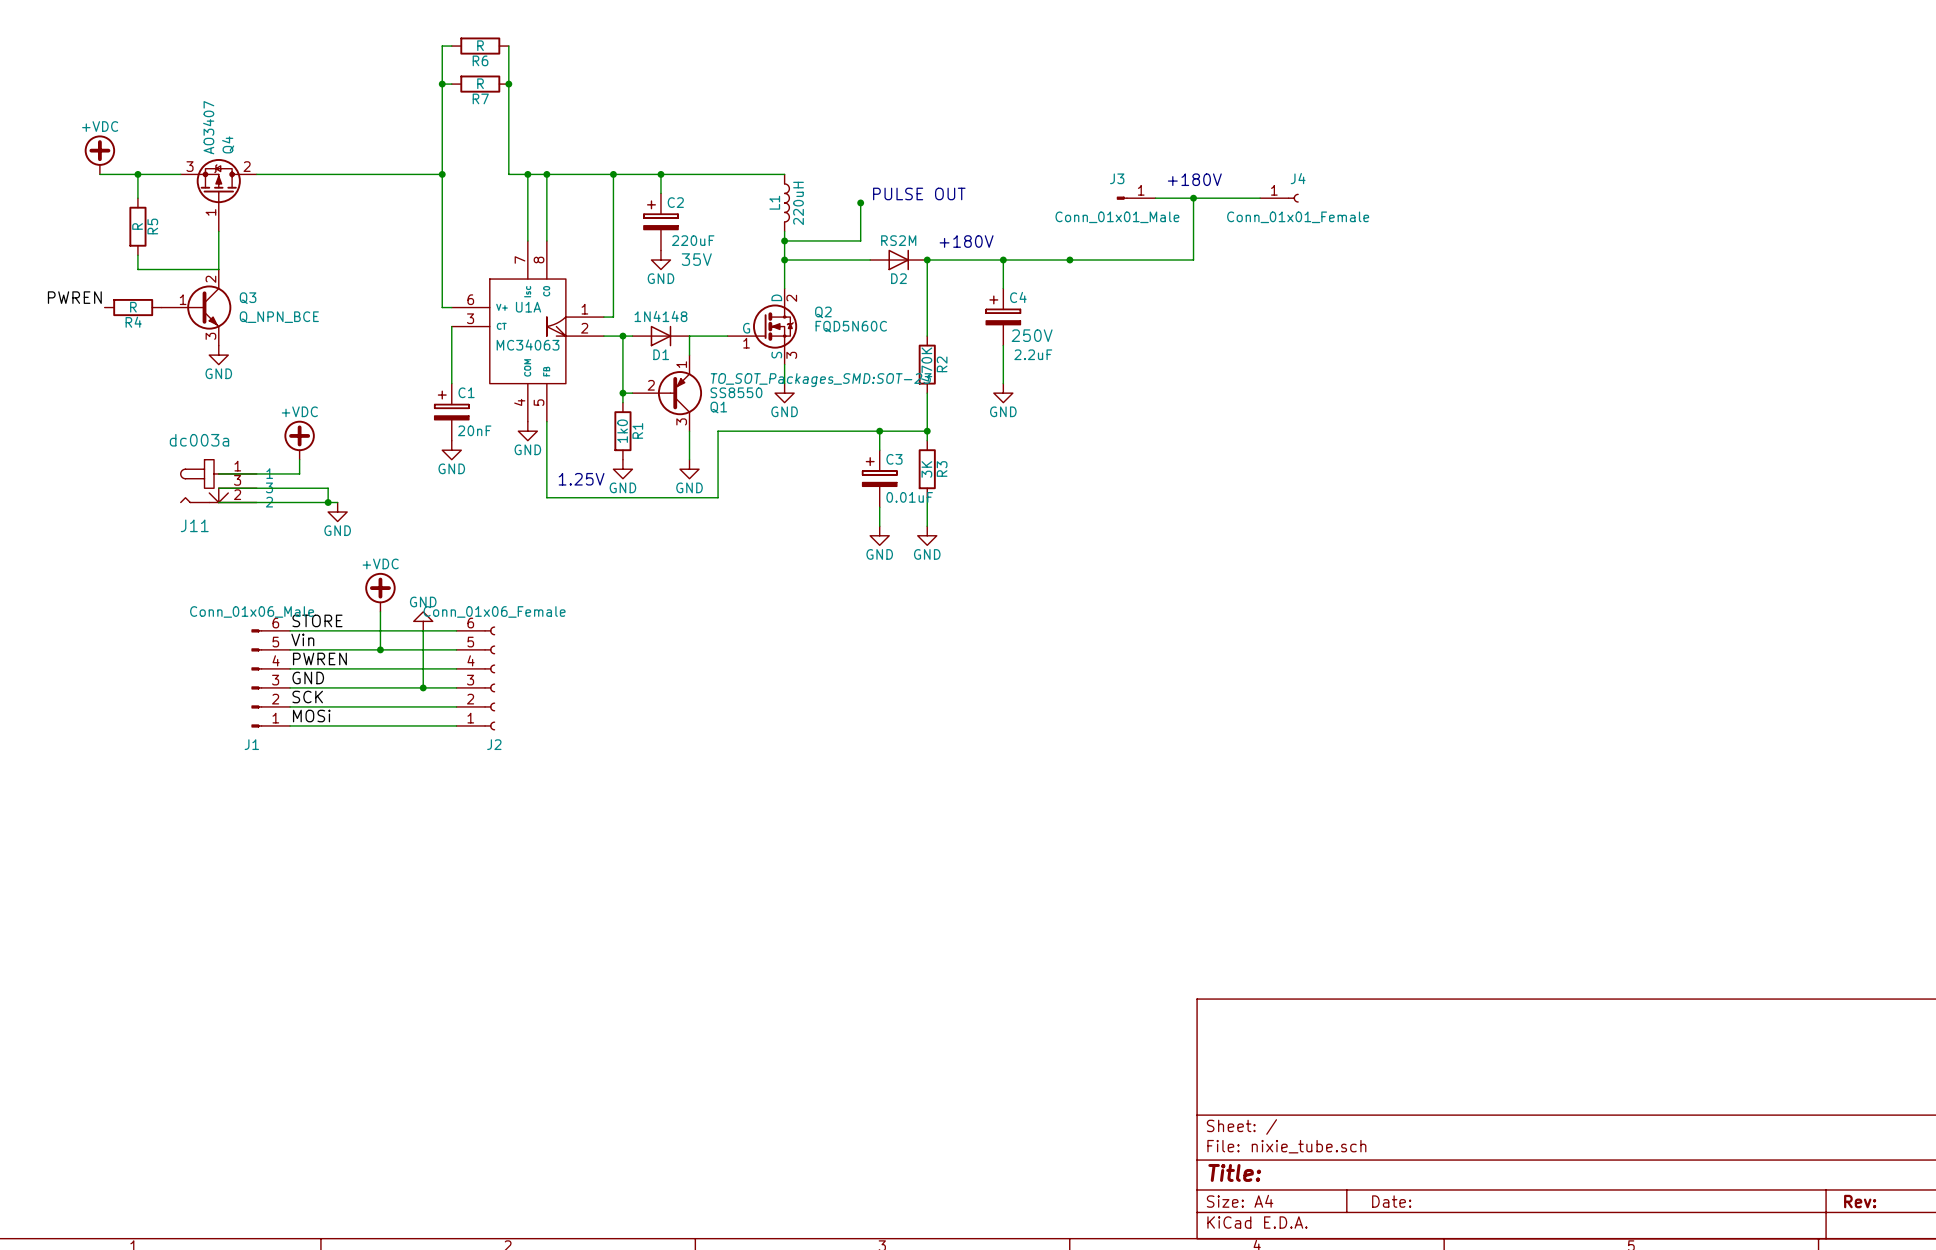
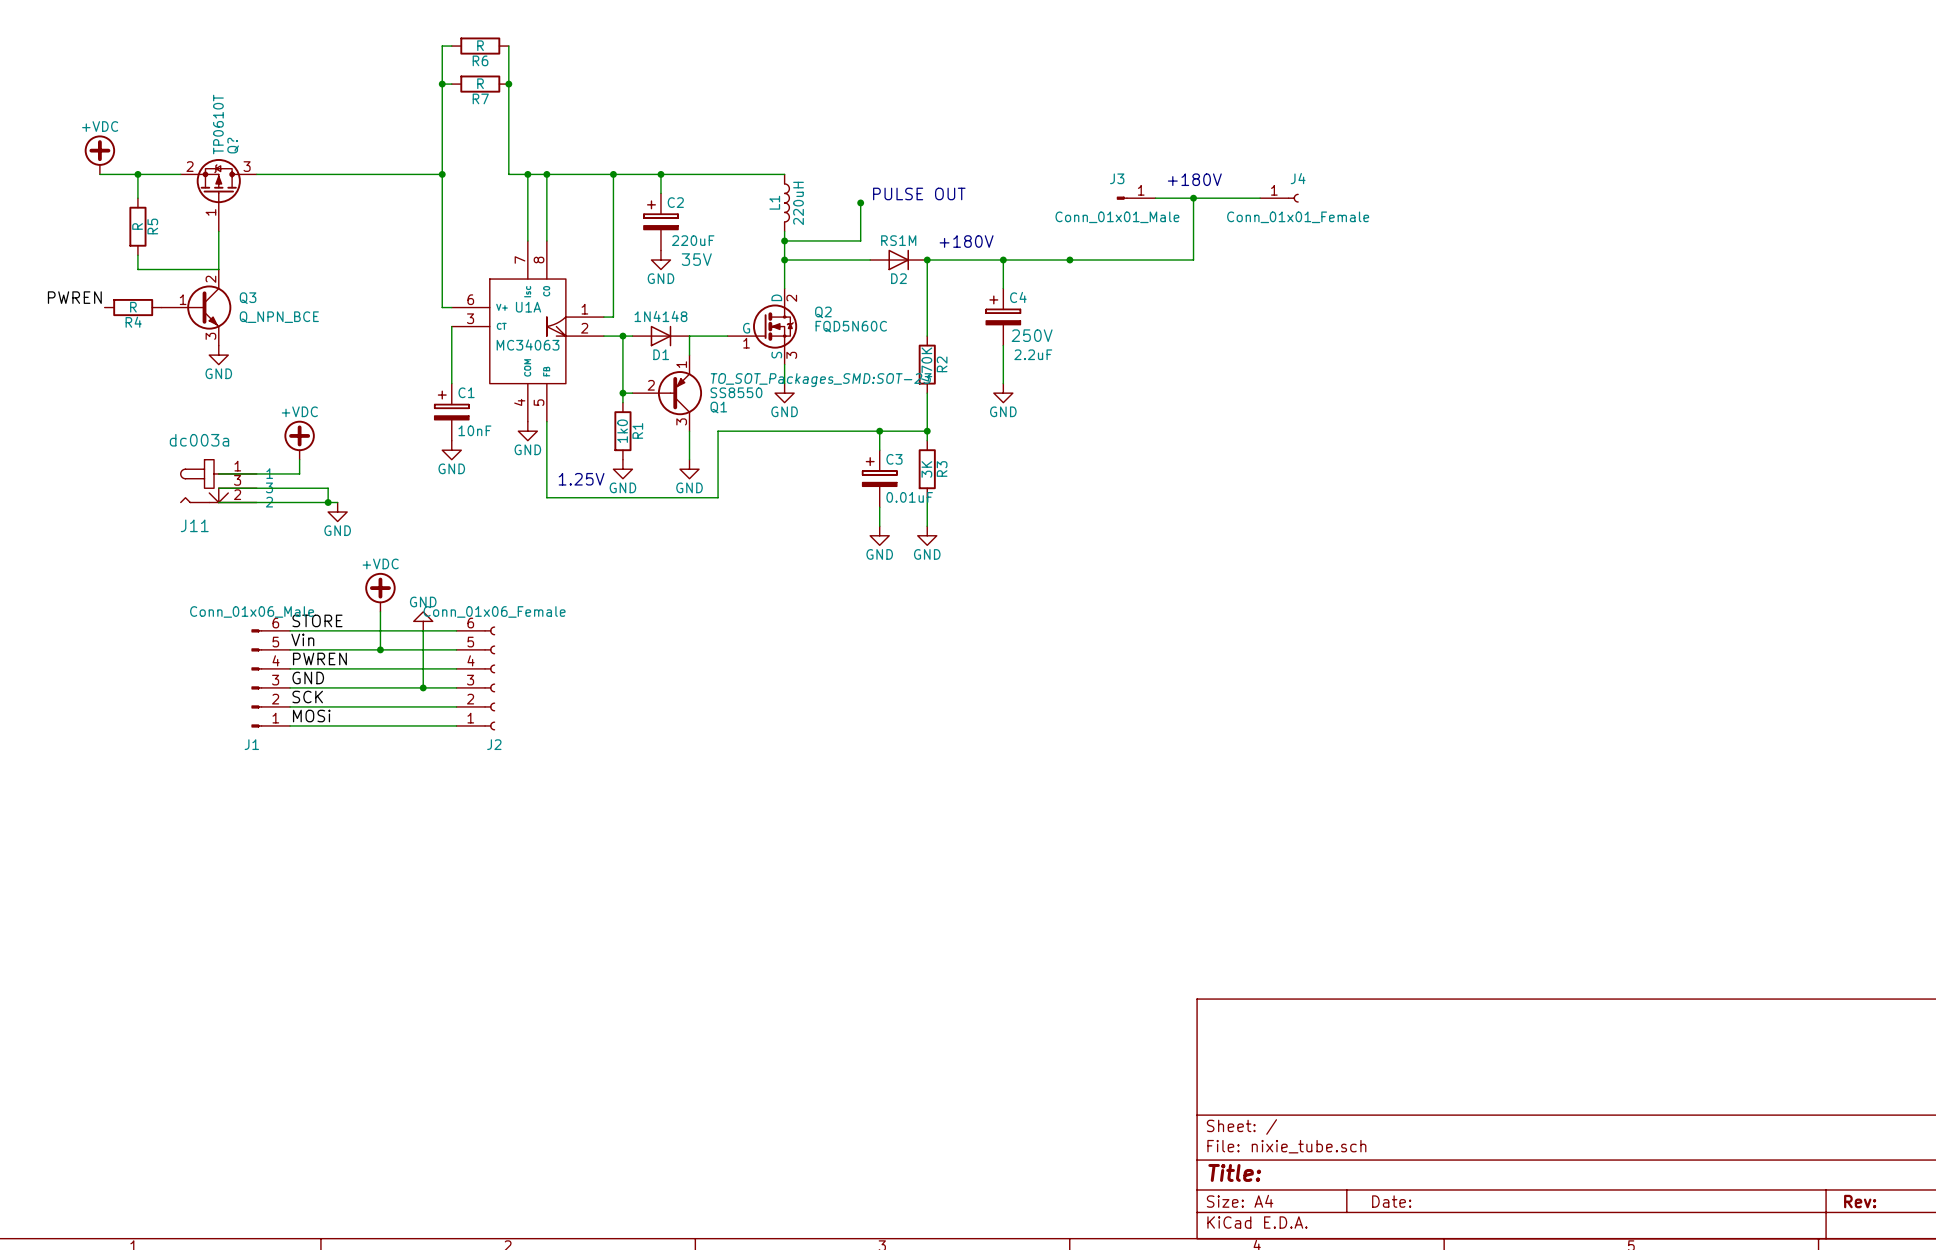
Q4: AO3407 (218, 195) -> none
Q?: none -> TP0610T (218, 195)
D2 value: RS2M (898, 240) -> RS1M (898, 240)
C1 value: 20nF (474, 430) -> 10nF (474, 430)

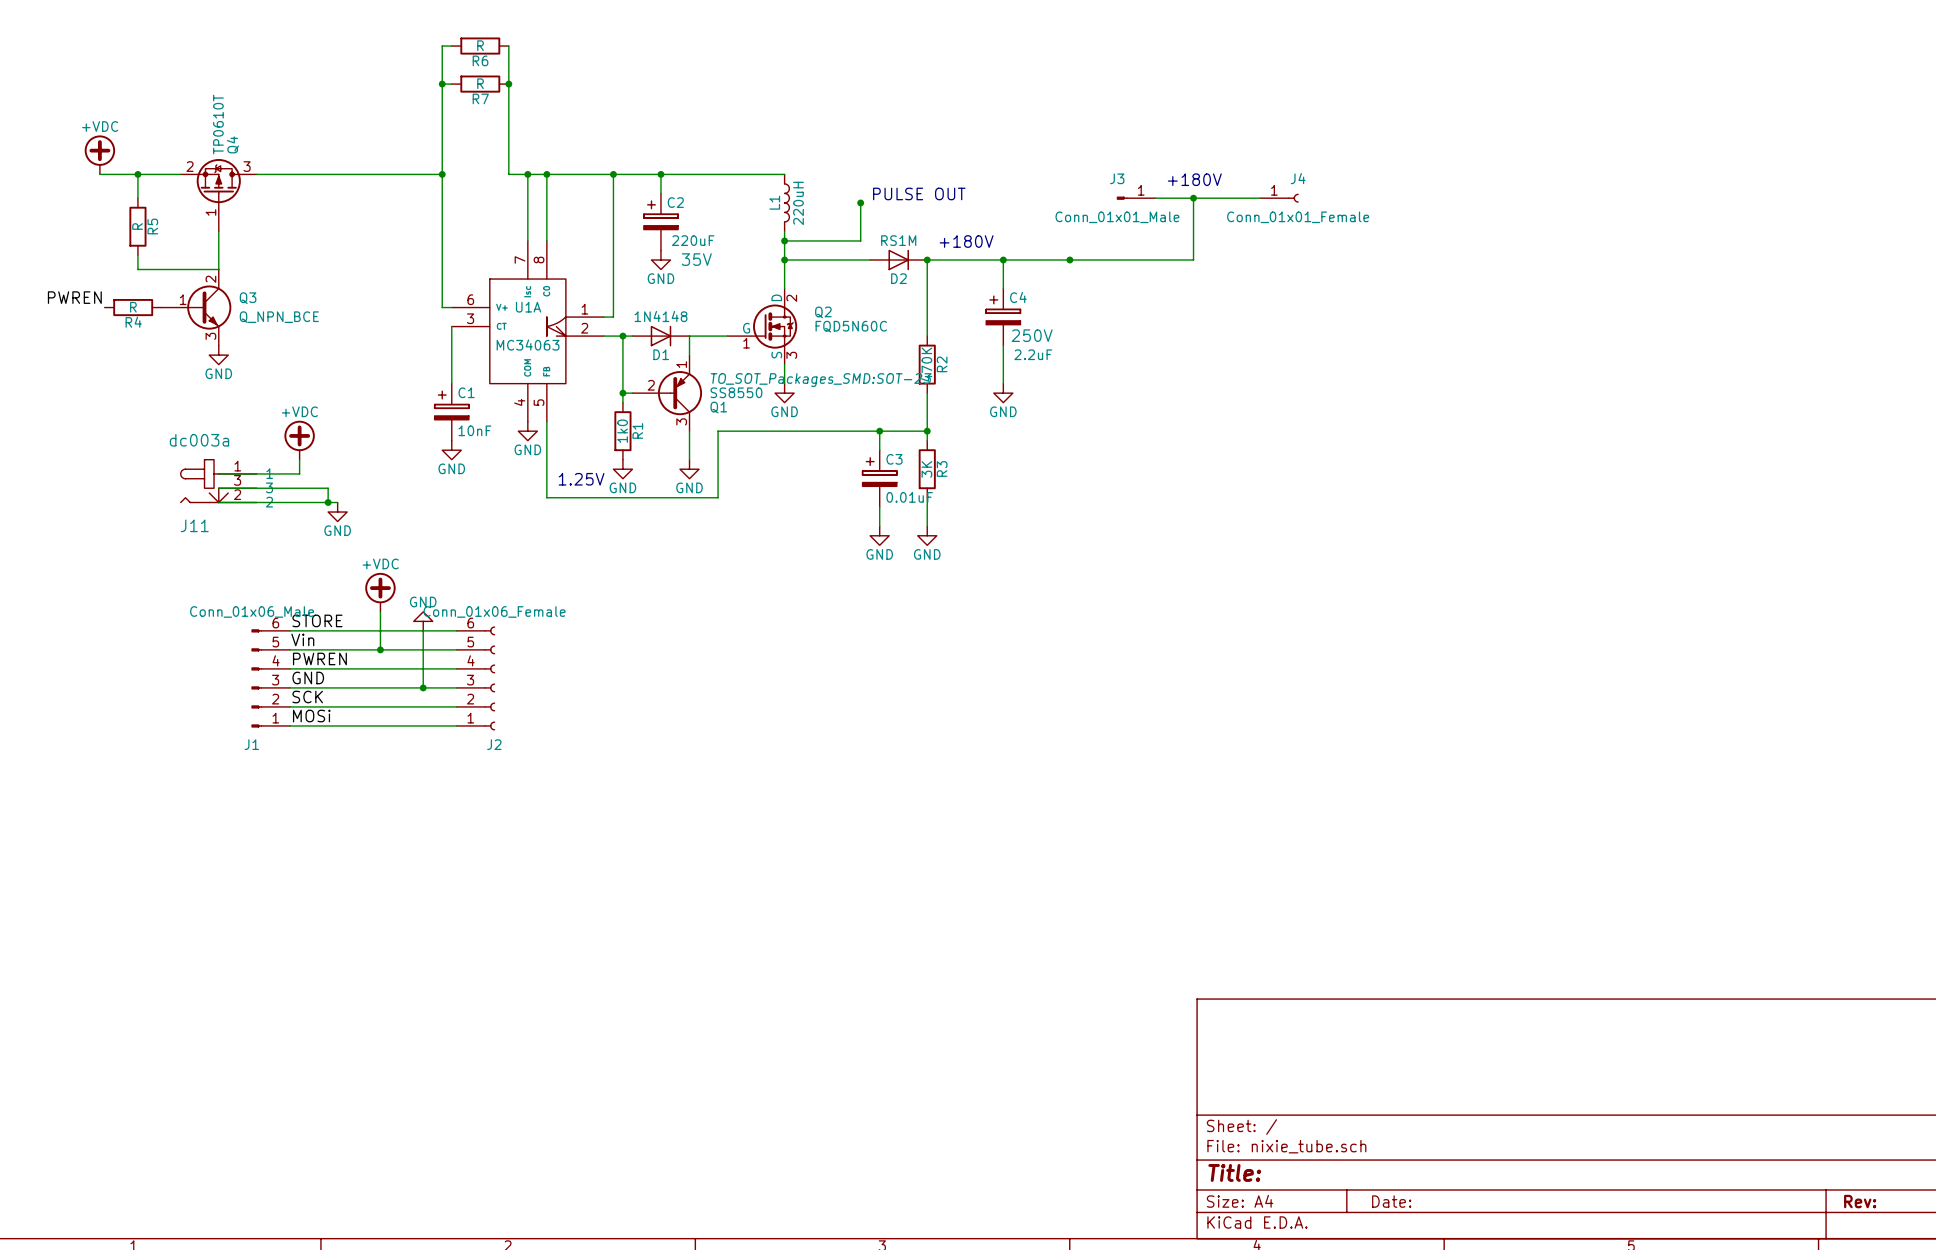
Q? name: Q? (233, 145) -> Q4 (232, 144)

